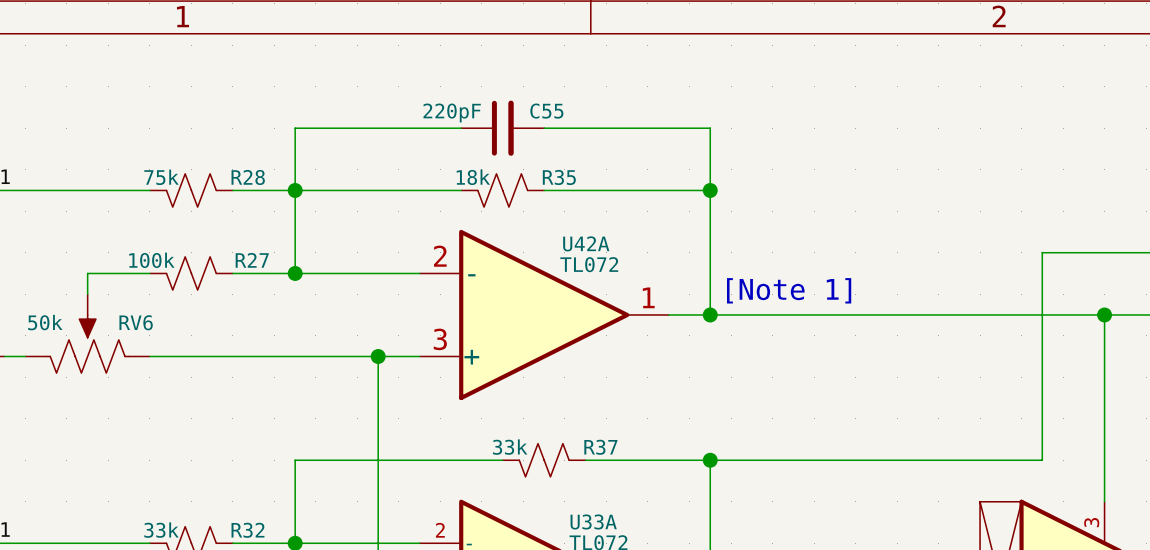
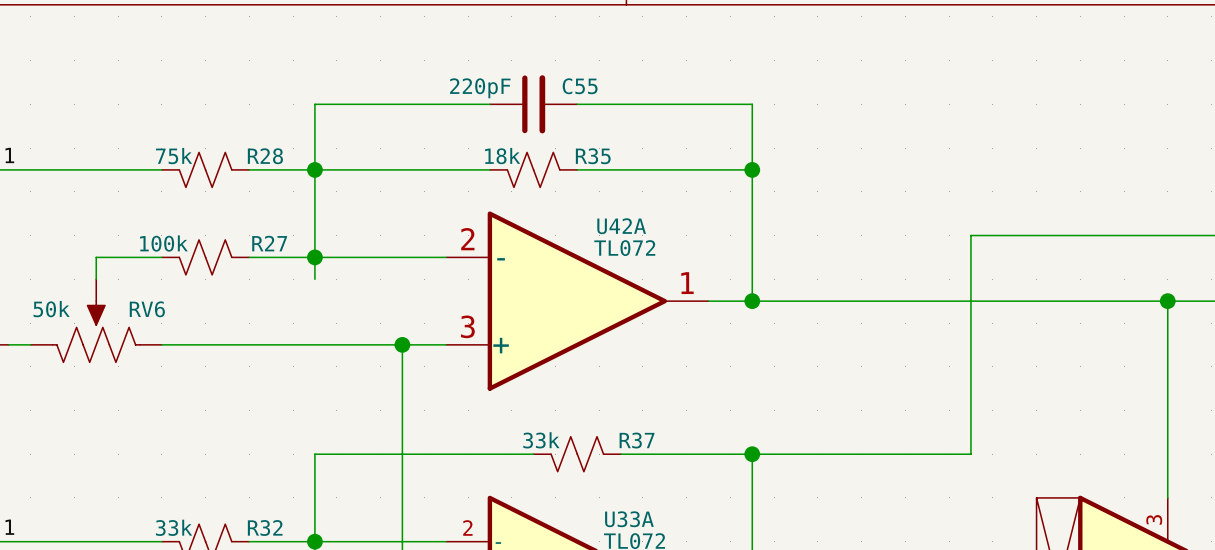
wire: (1042, 252) (1042, 460) (917, 460) -> (1102, 235) (970, 235) (970, 454)
wire: none -> (314, 257) (314, 279)
text: [Note 1] (789, 290) -> none

